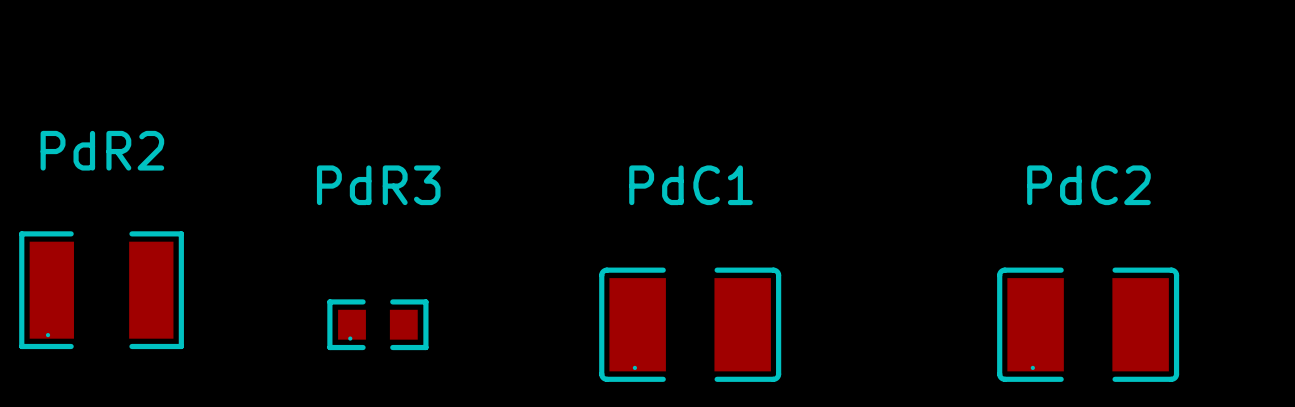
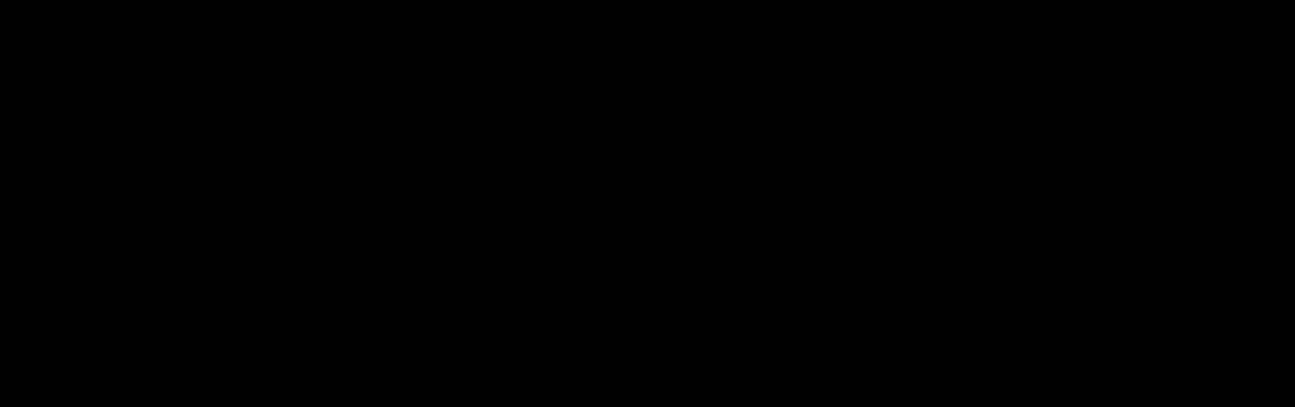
PdR2: (101, 290) -> none
PdR3: (377, 324) -> none
PdC1: (690, 324) -> none
PdC2: (1088, 324) -> none

